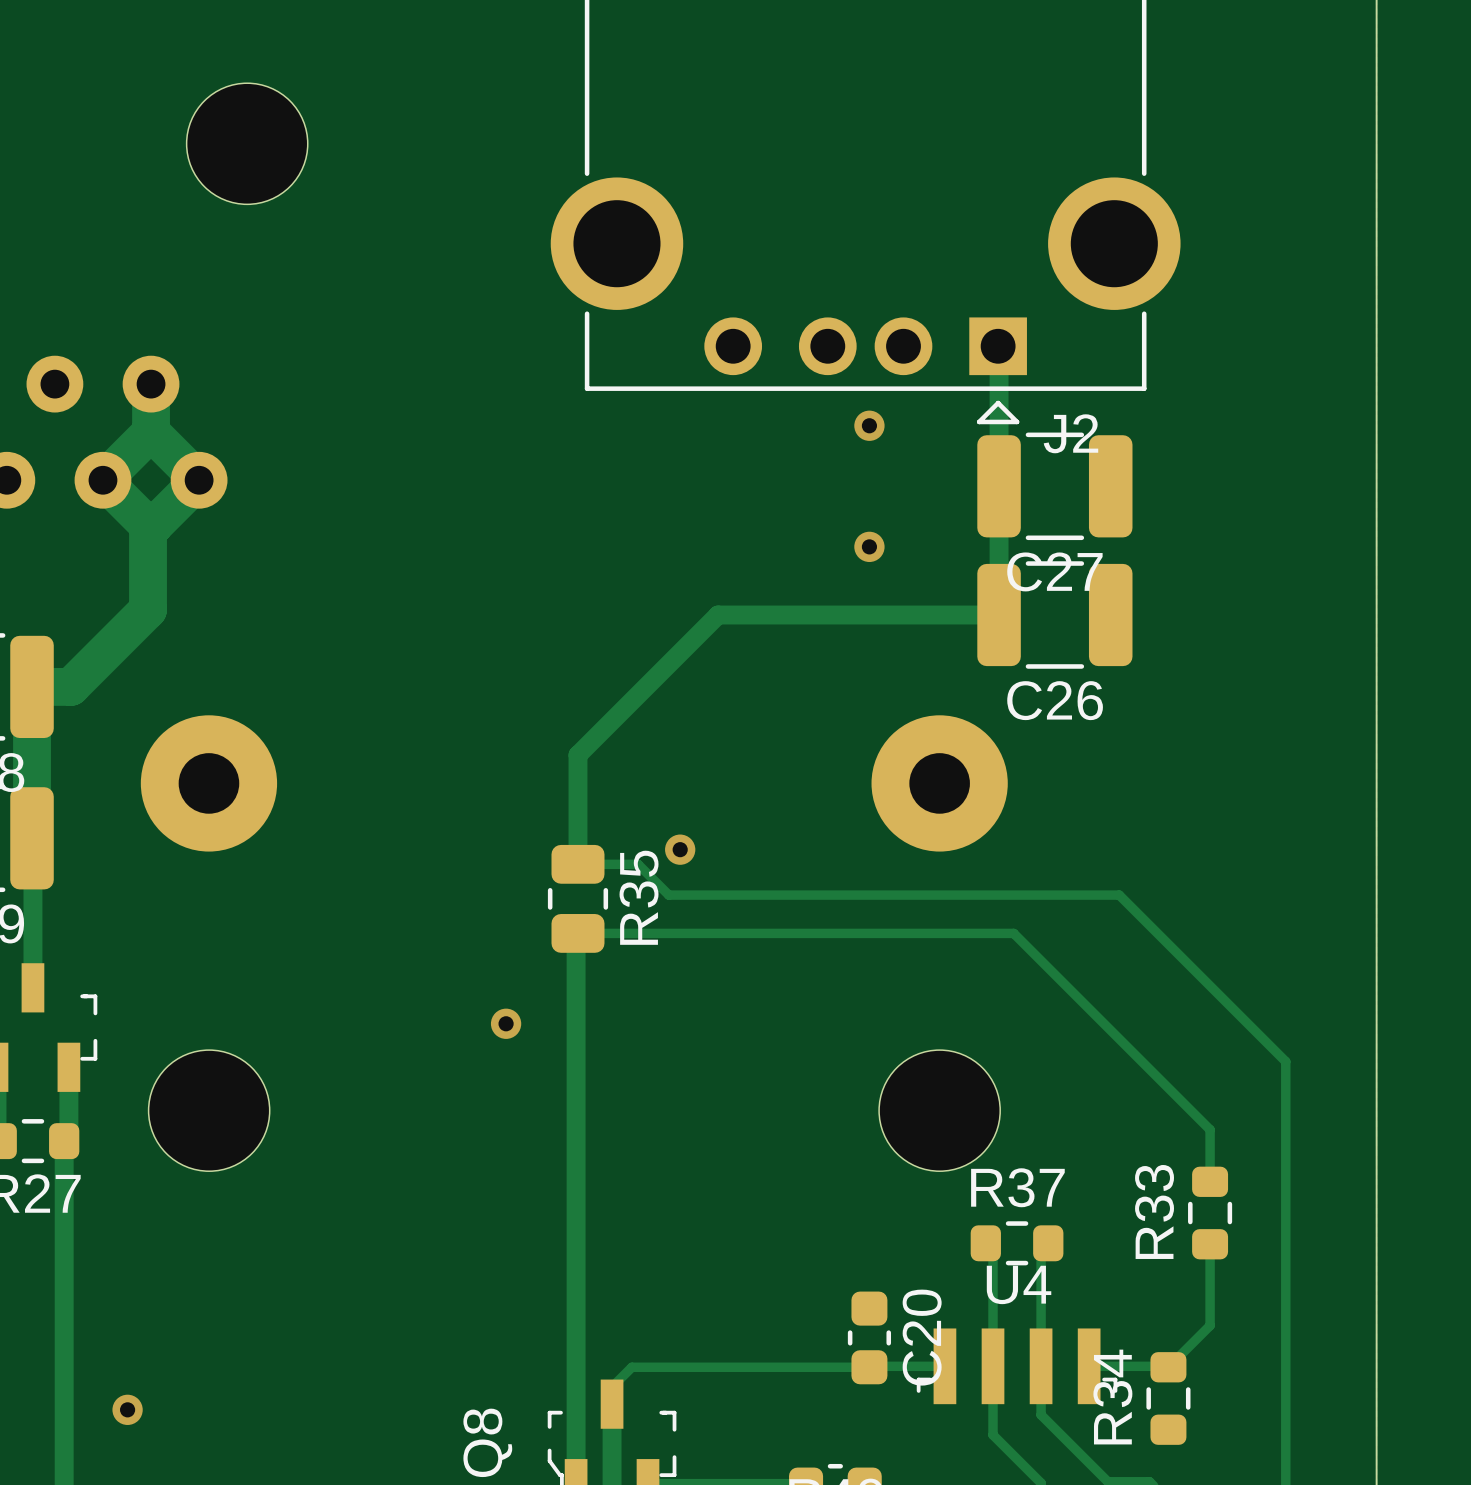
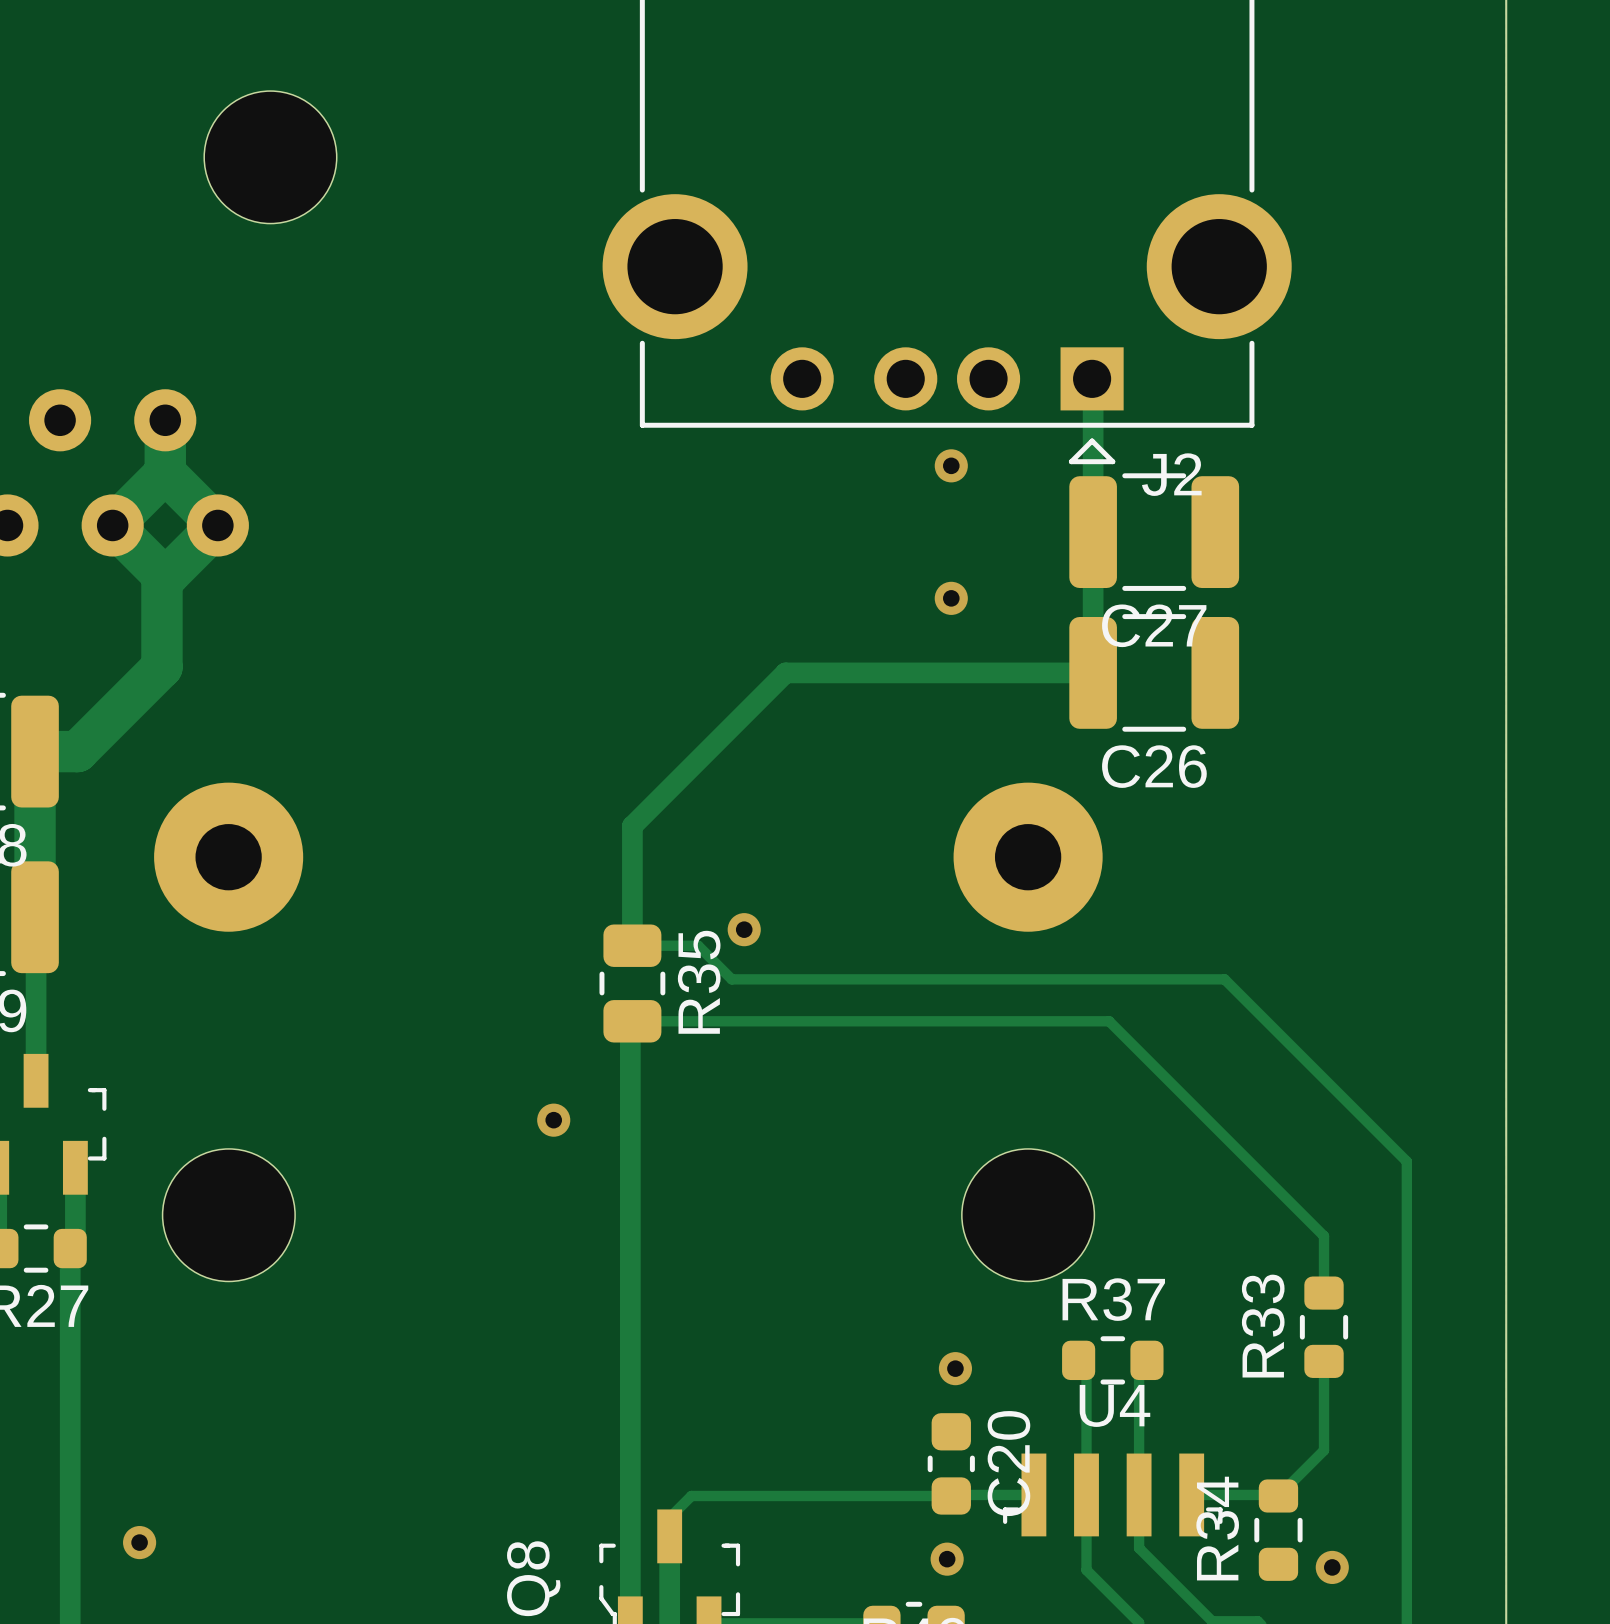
via: none -> (955, 1368)
via: none -> (947, 1559)
via: none -> (1332, 1567)

